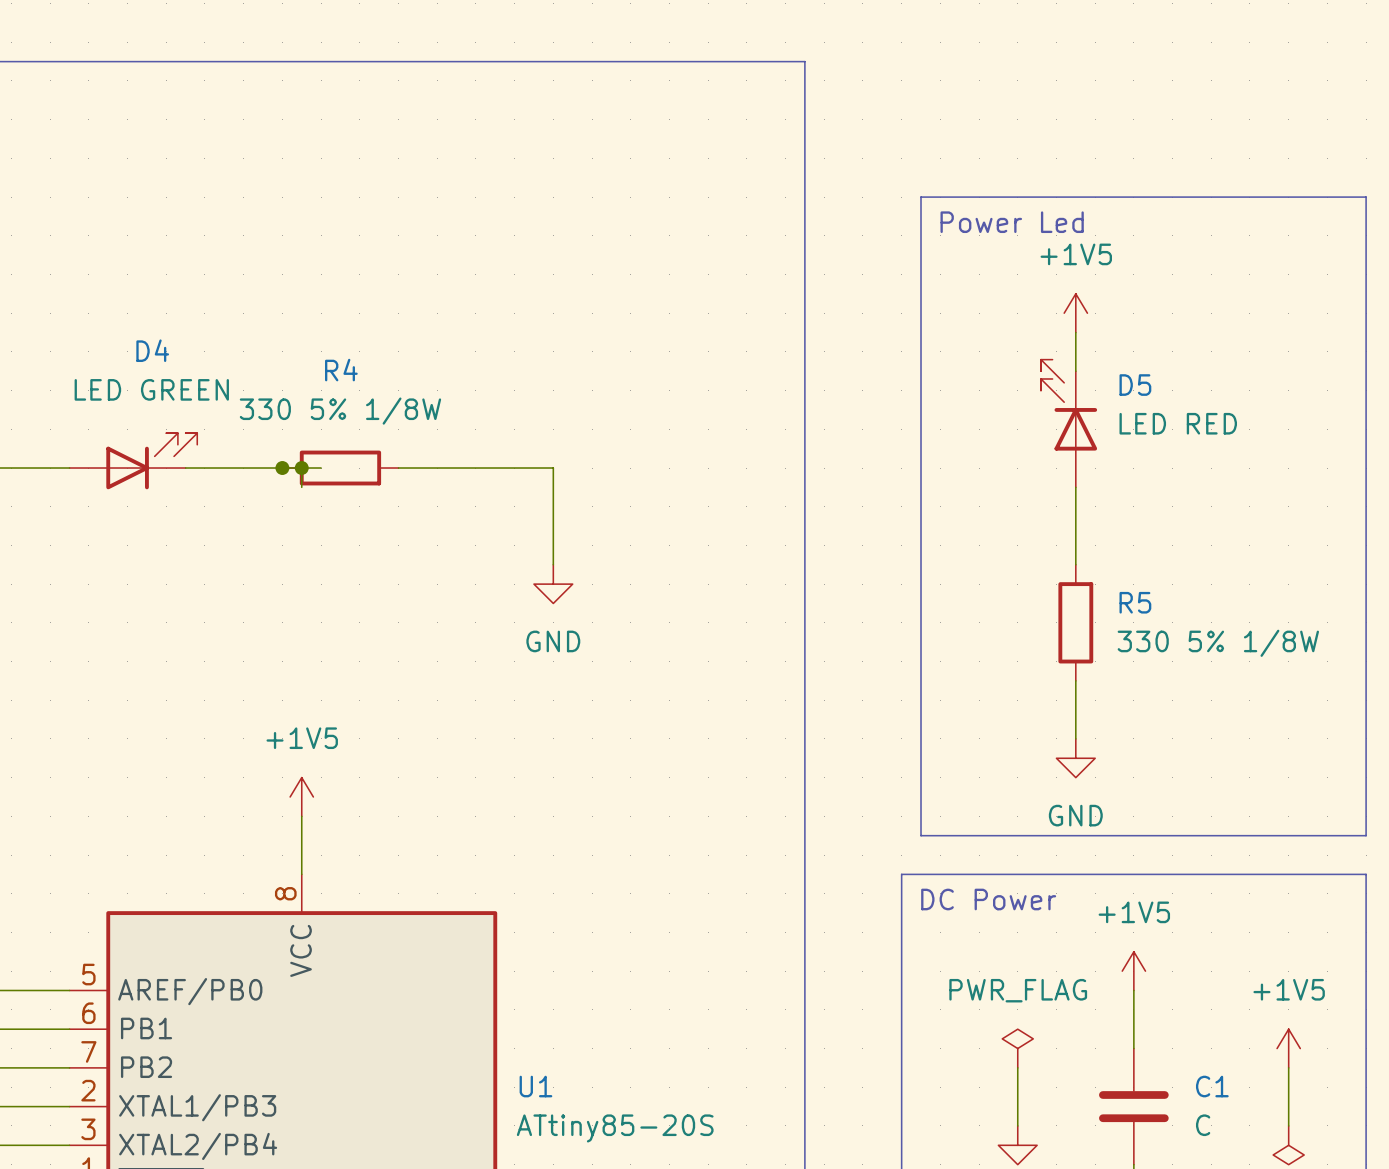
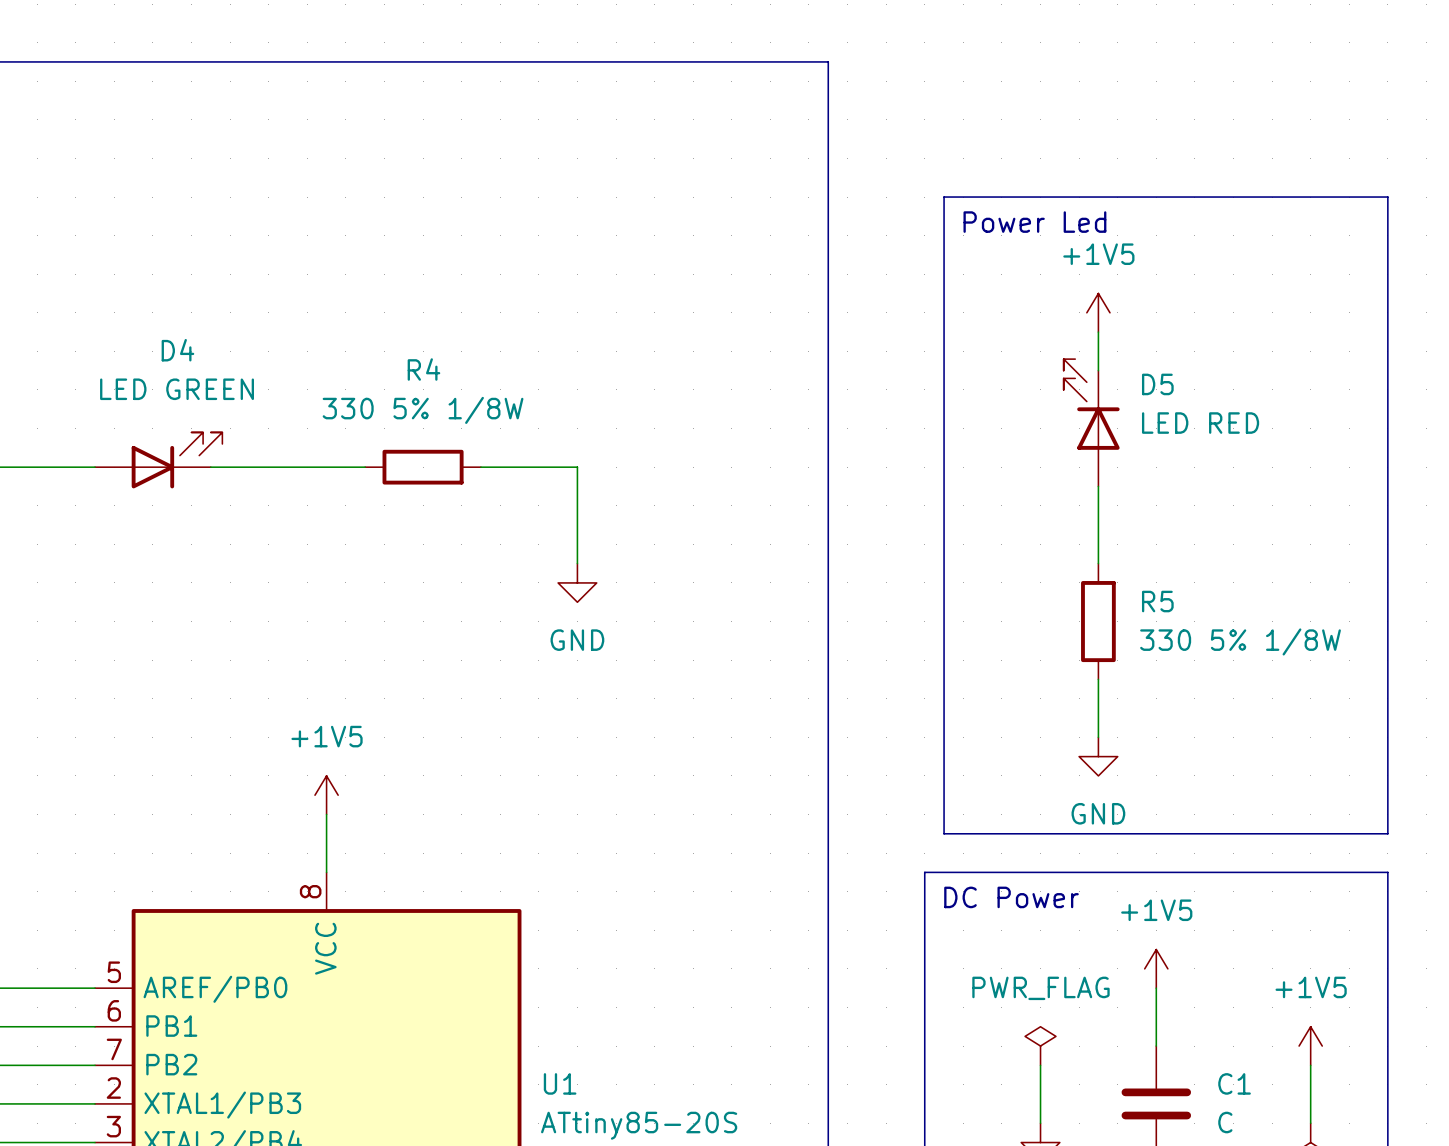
junction: (282, 468) -> none
wire: (301, 468) (301, 487) -> none
junction: (301, 468) -> none
wire: none -> (345, 467) (365, 467)
R4 position: (340, 468) -> (423, 467)
wire: (398, 468) (456, 468) -> none

